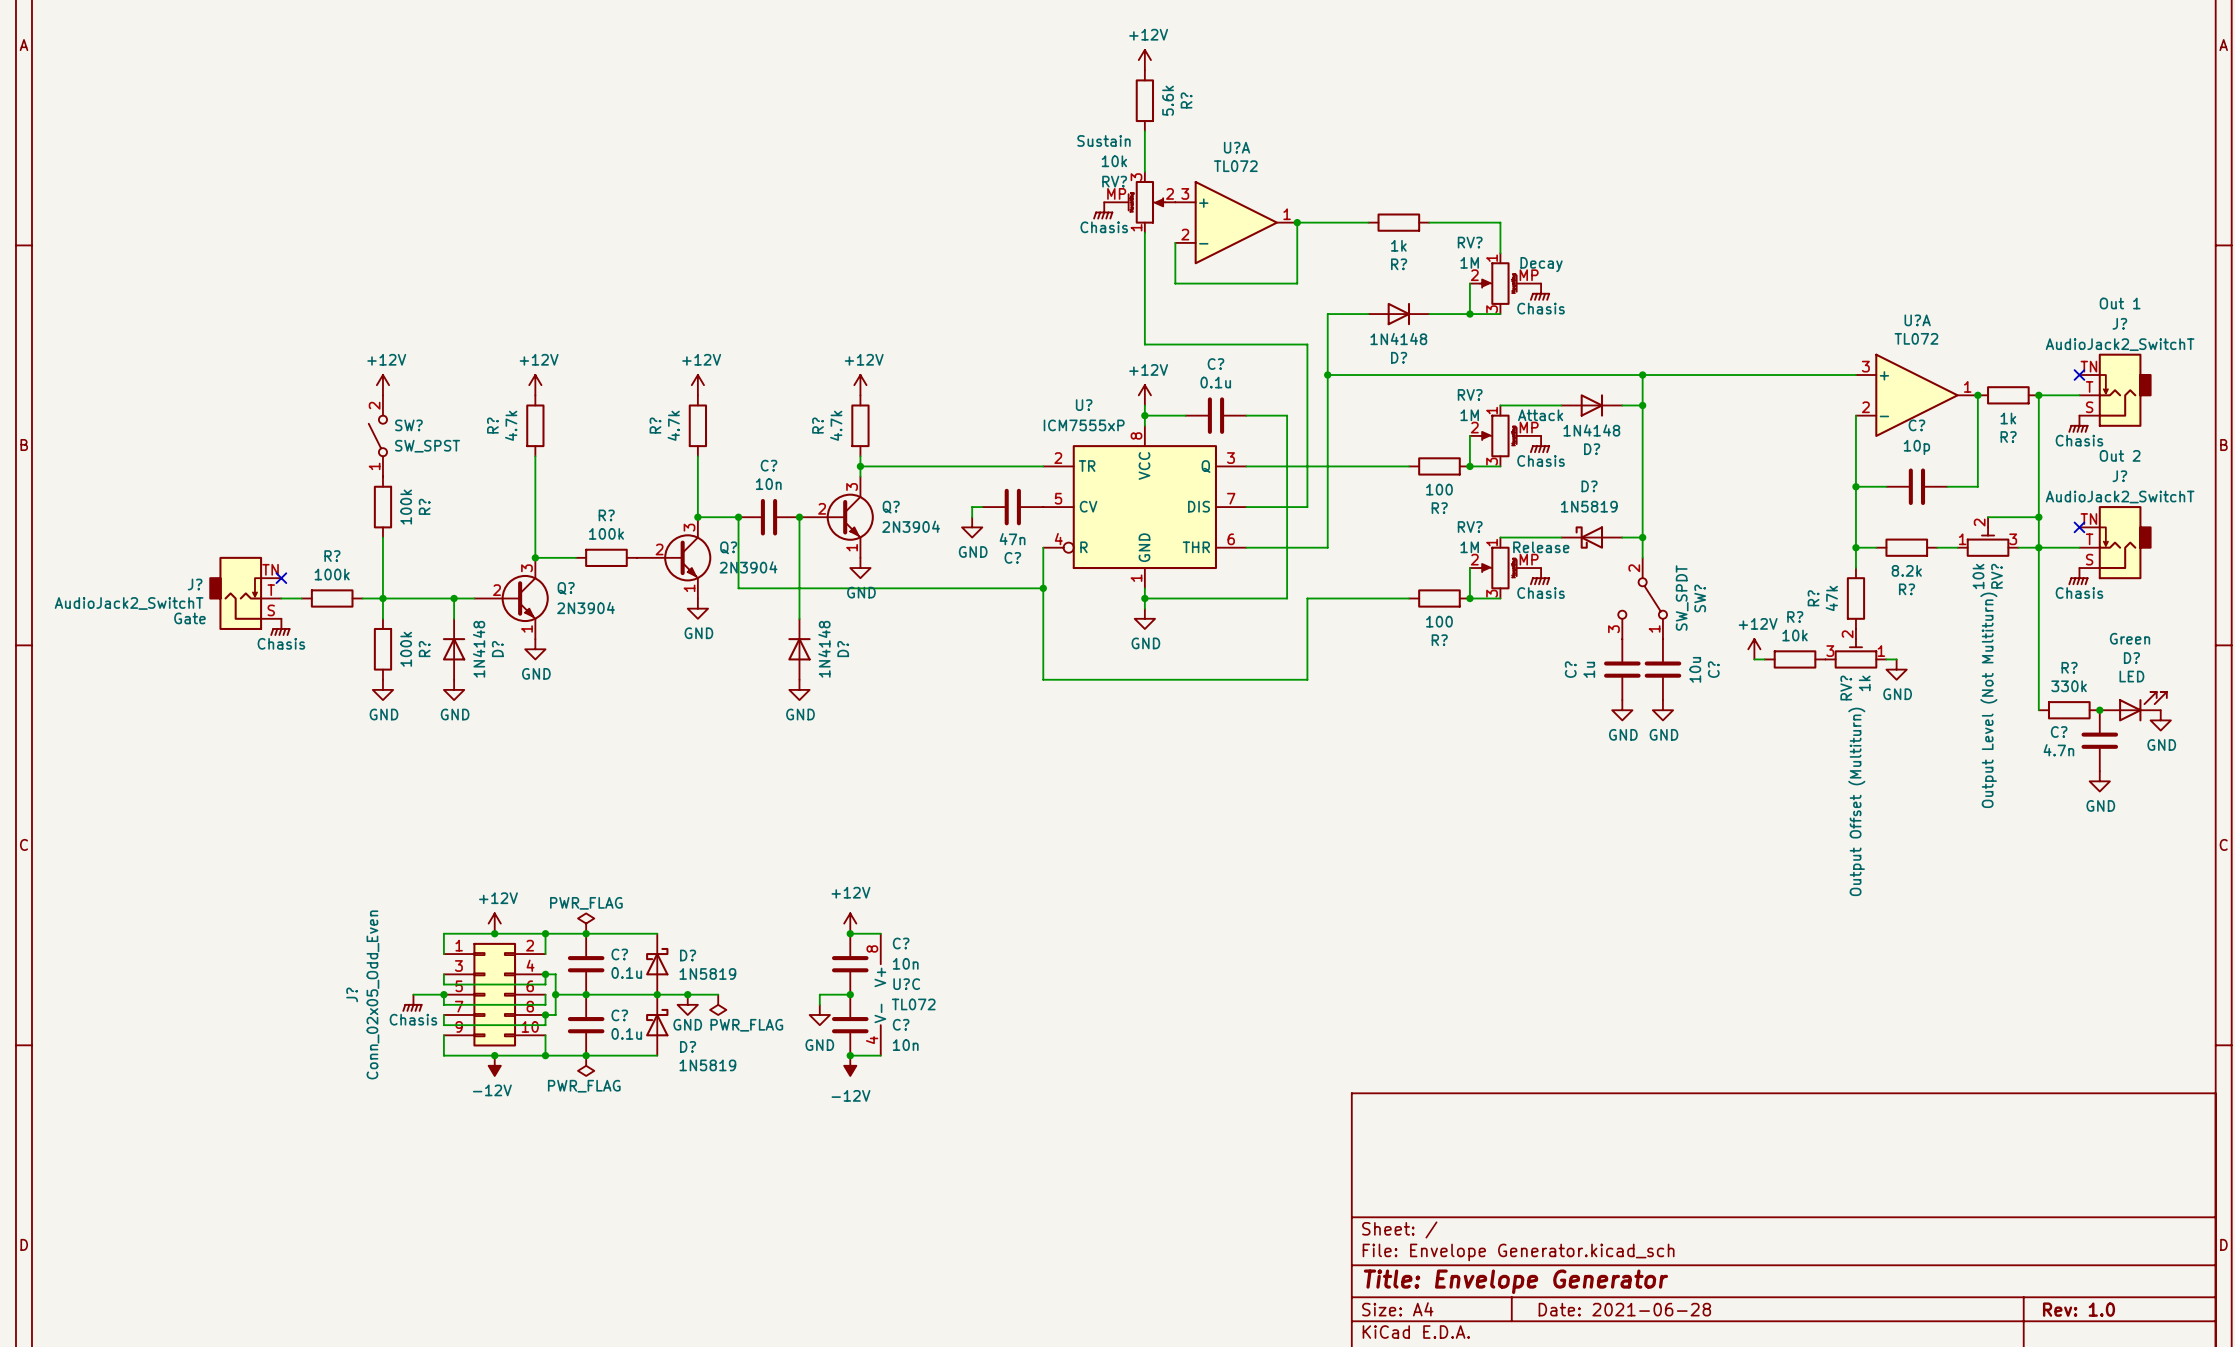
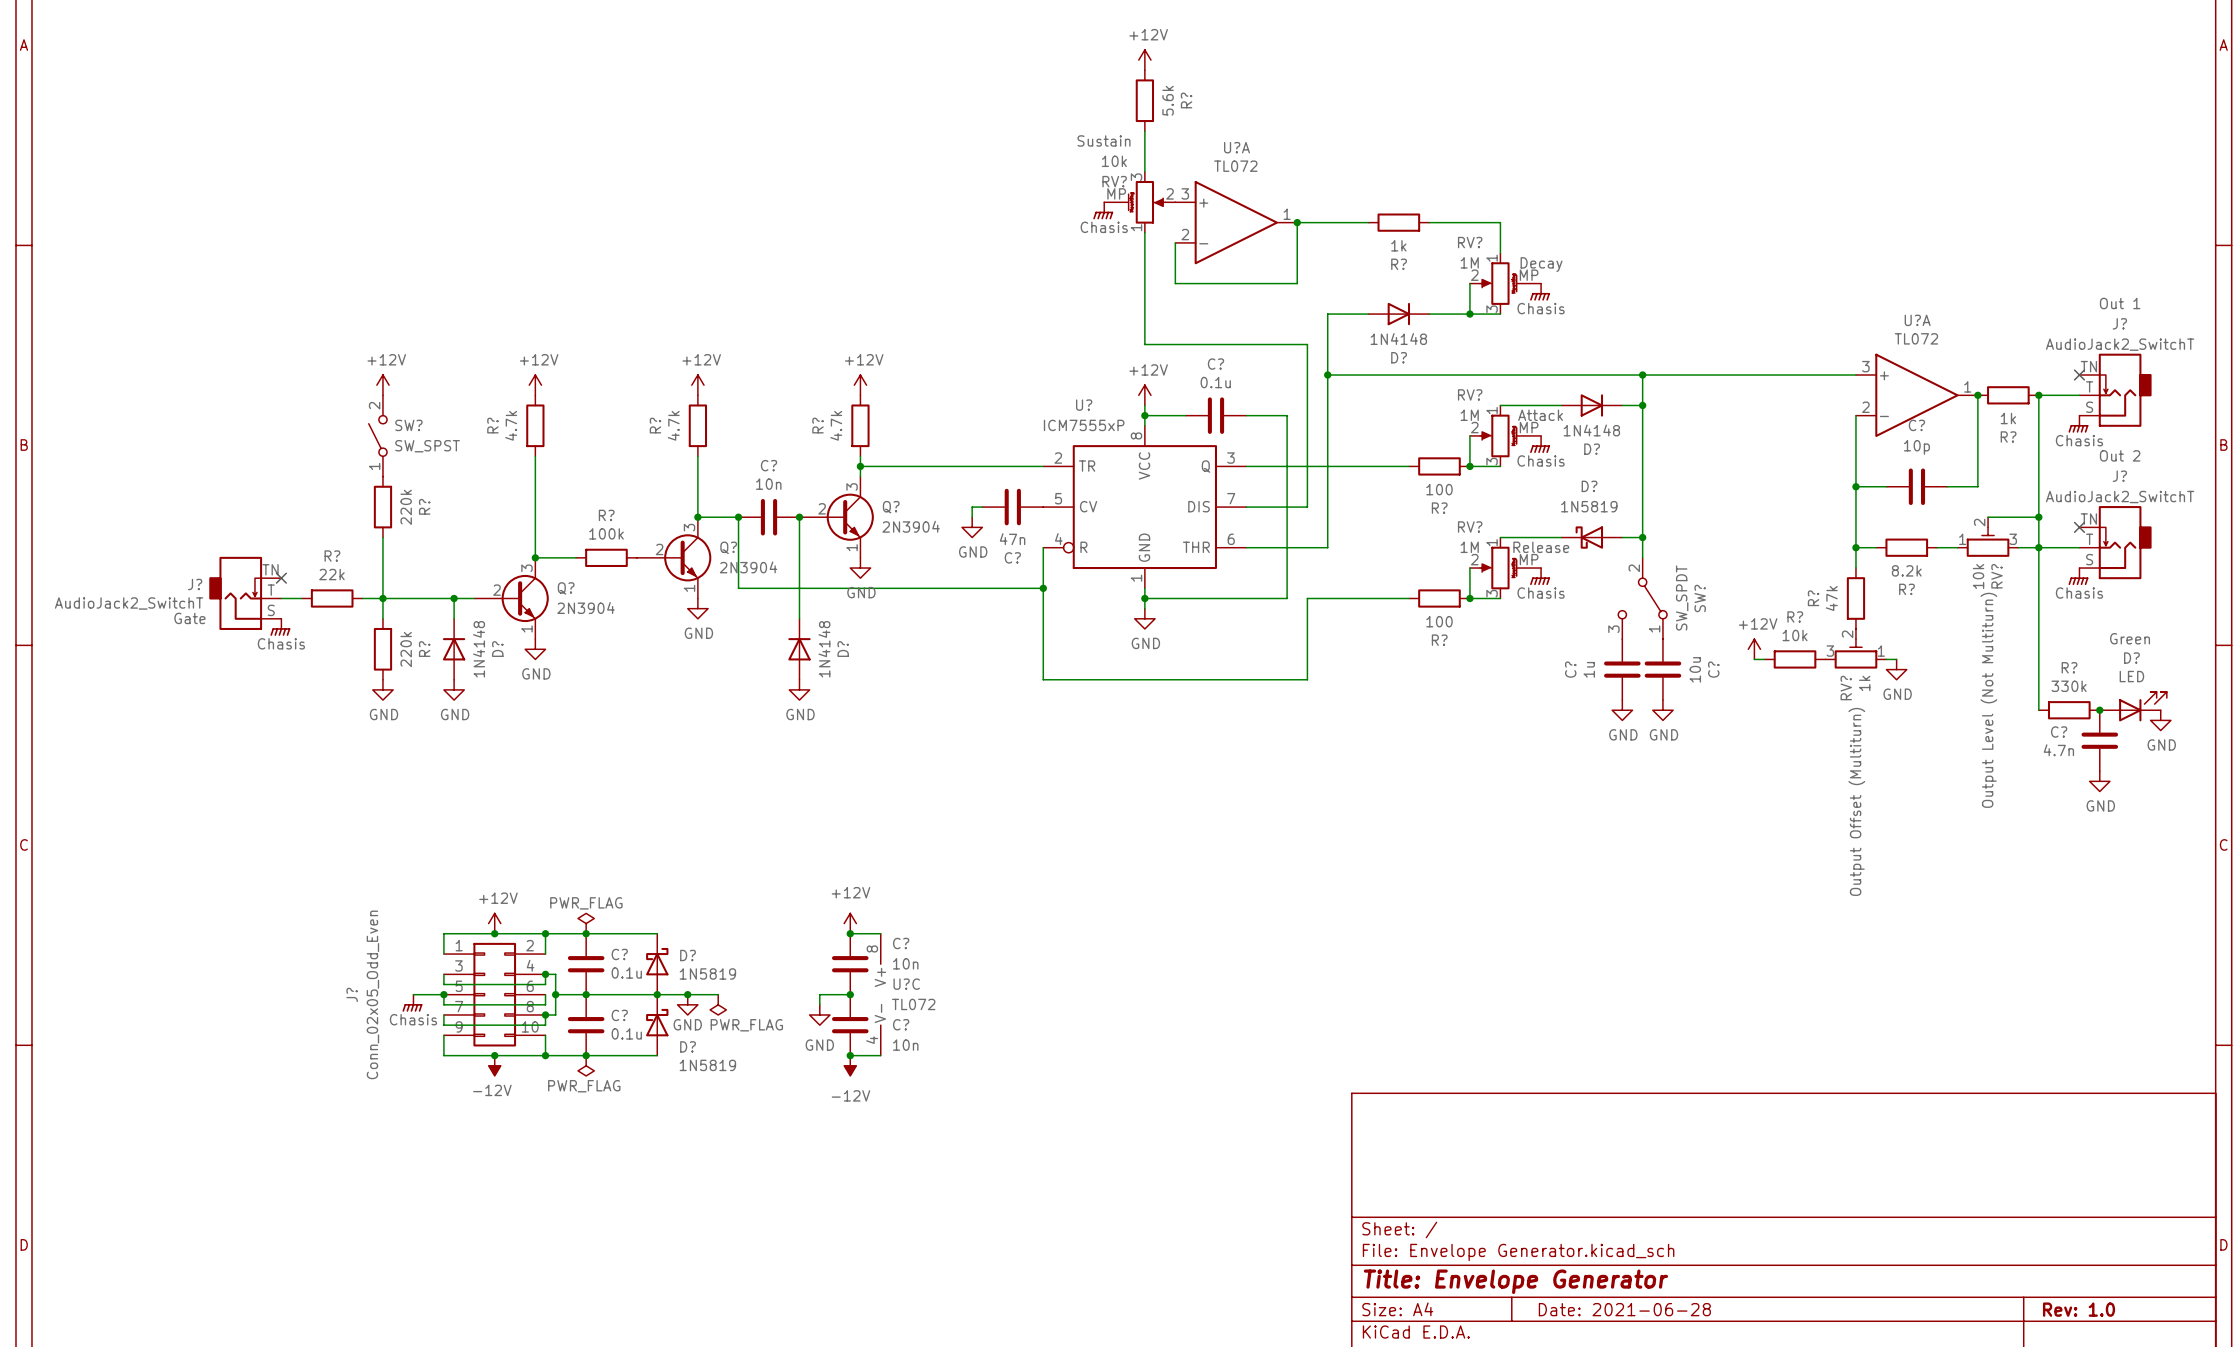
R? value: 100k (406, 507) -> 220k (406, 507)
R? value: 100k (332, 574) -> 22k (331, 574)
R? value: 100k (406, 649) -> 220k (406, 649)

